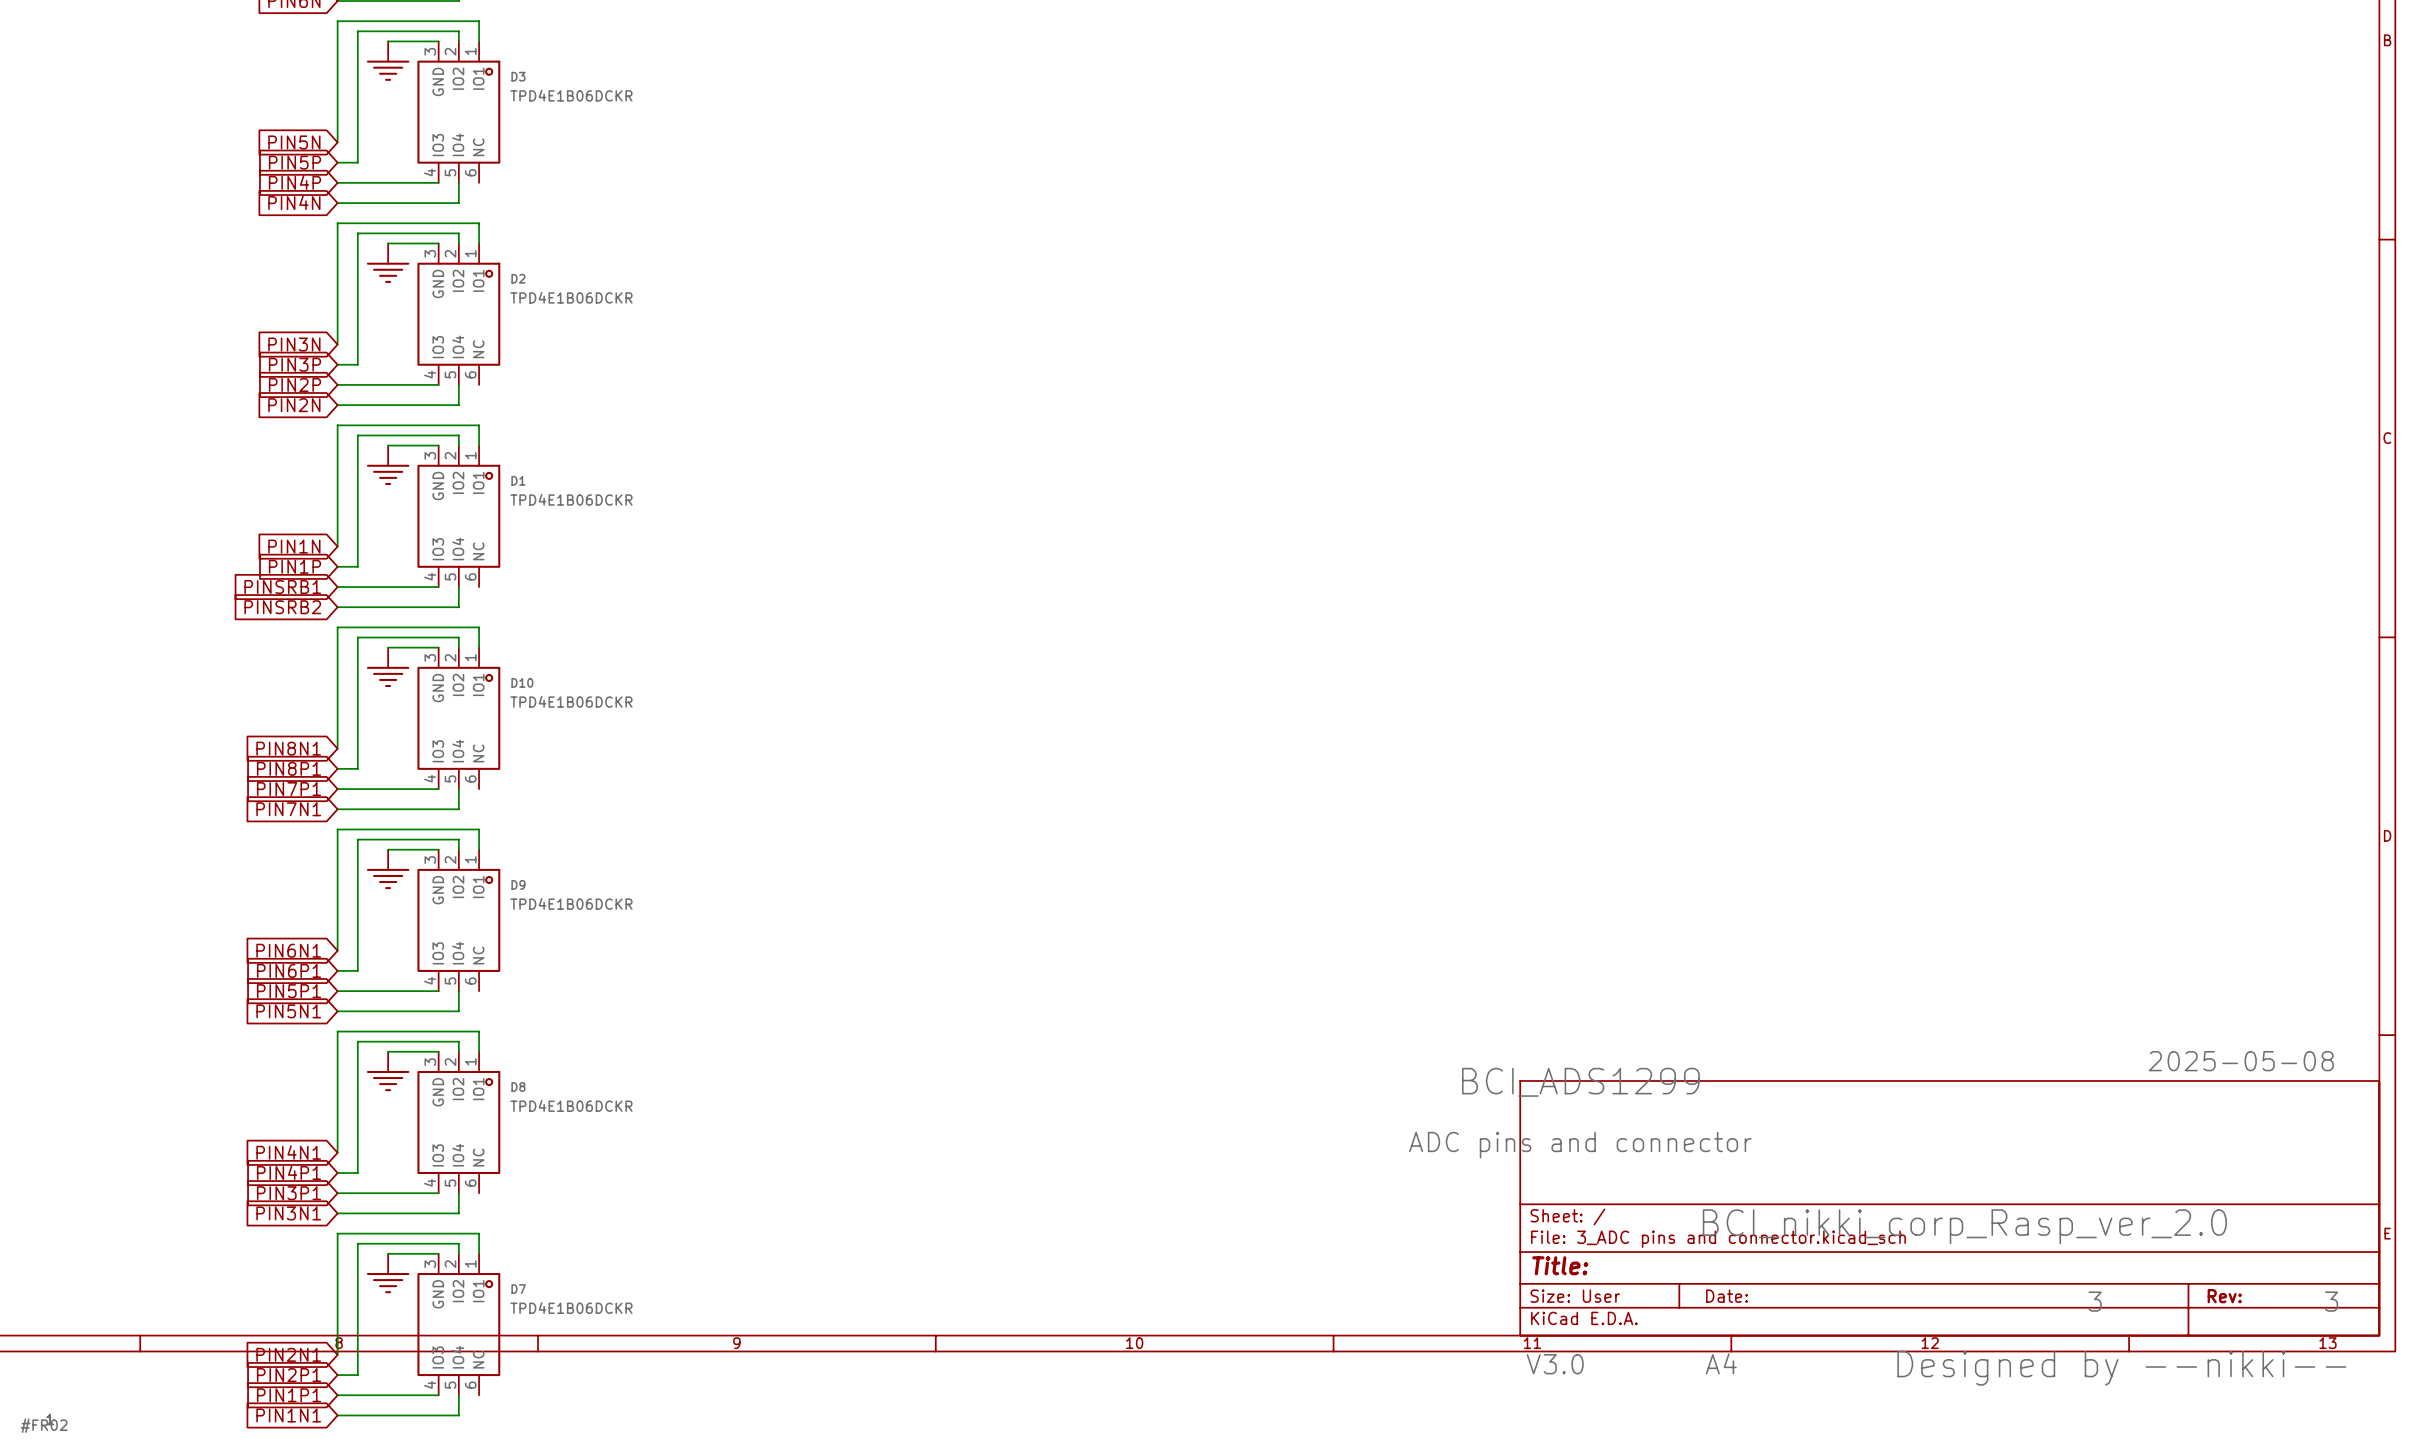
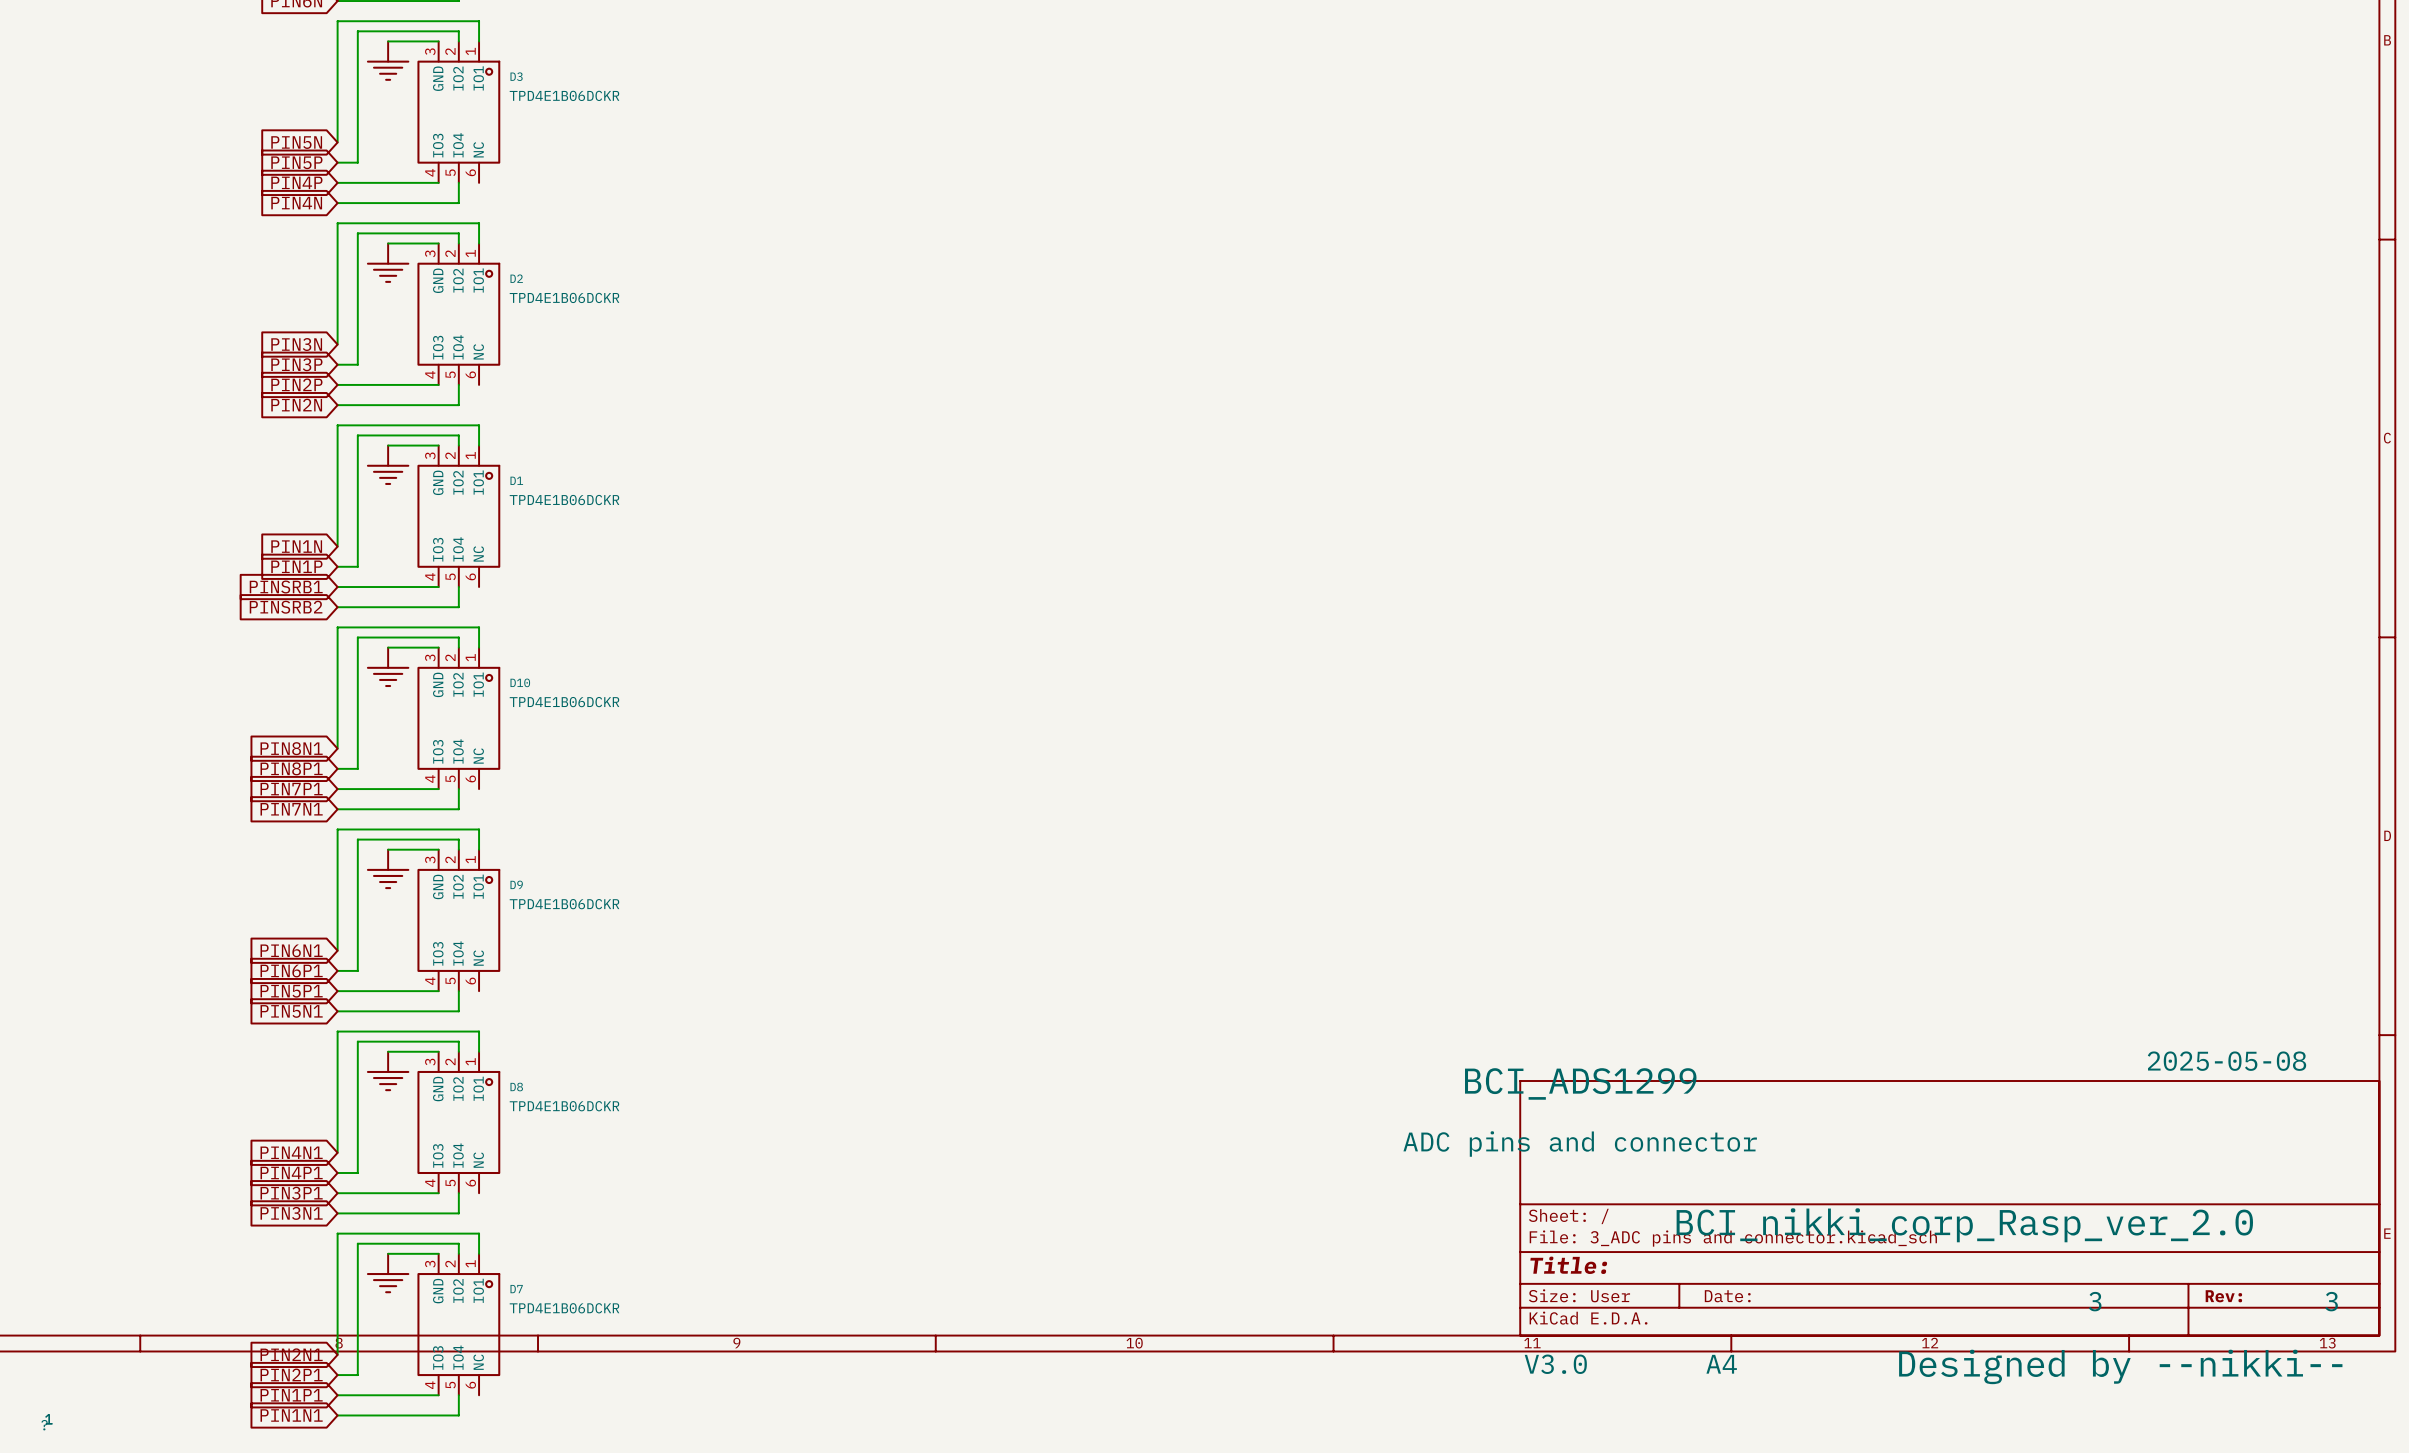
#FR02: (1183, 1241) -> none
part: none -> (1191, 1240)

